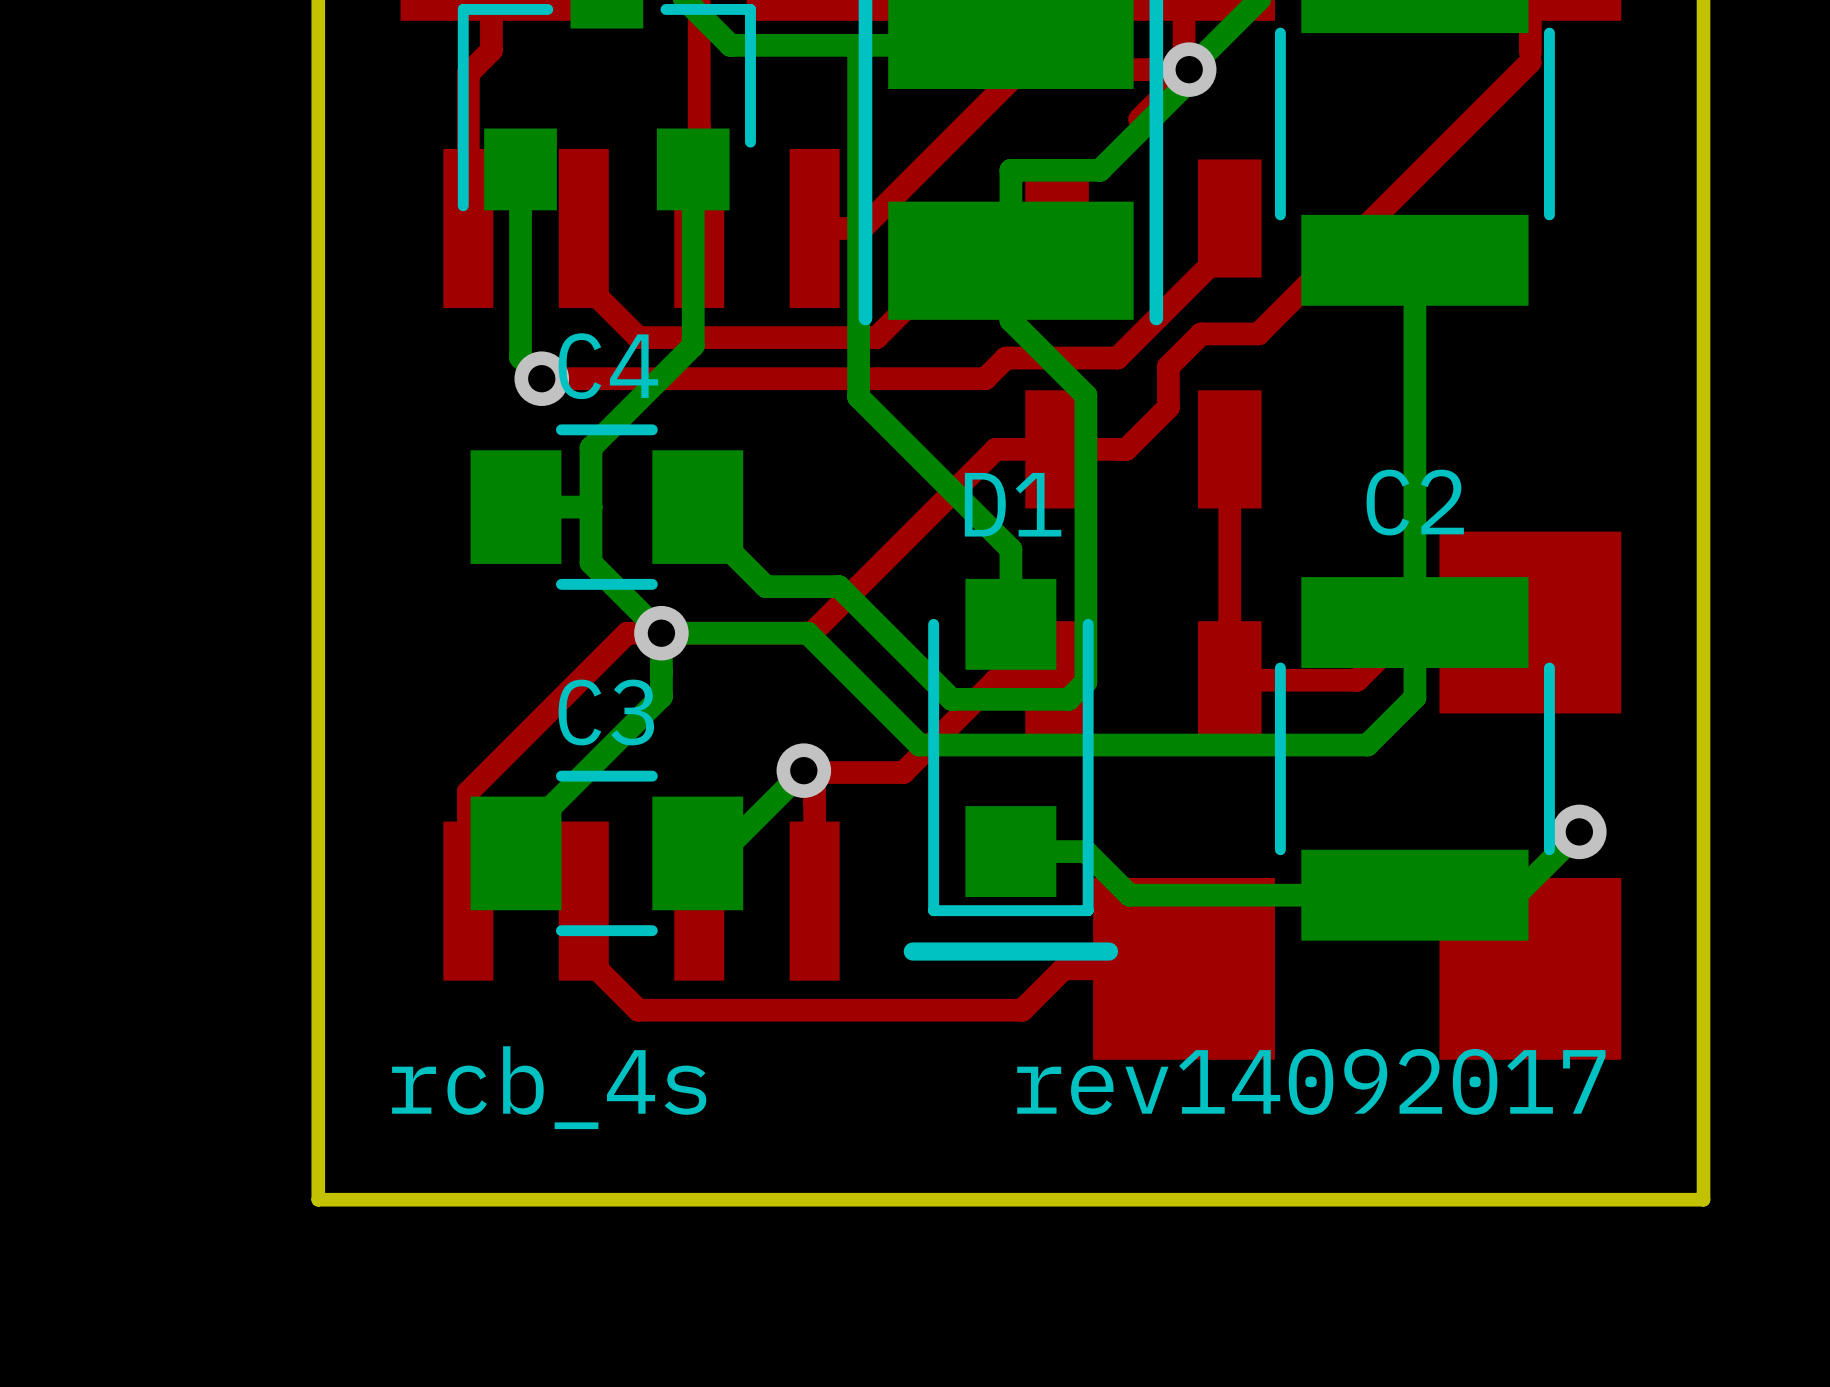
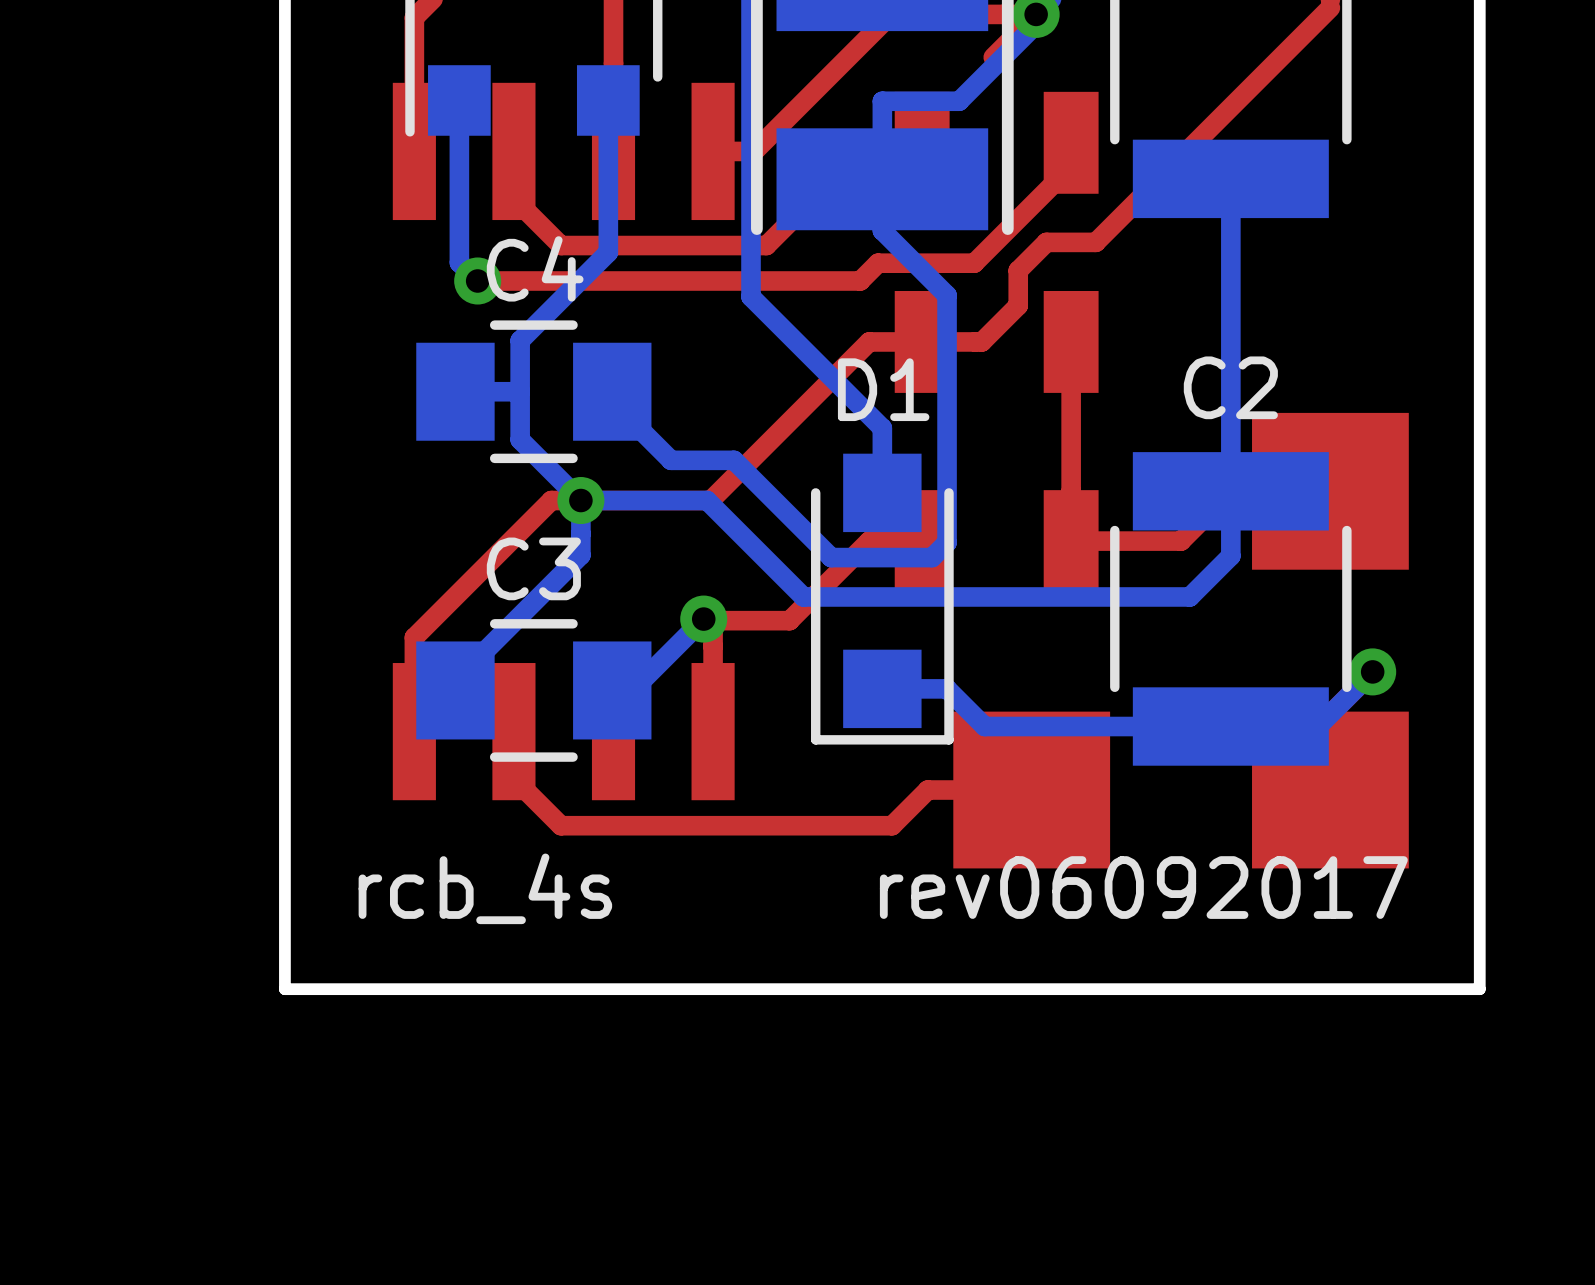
line: (1109, 951) (912, 951) -> none
text: rev14092017 (1311, 1081) -> rev06092017 (1143, 887)

